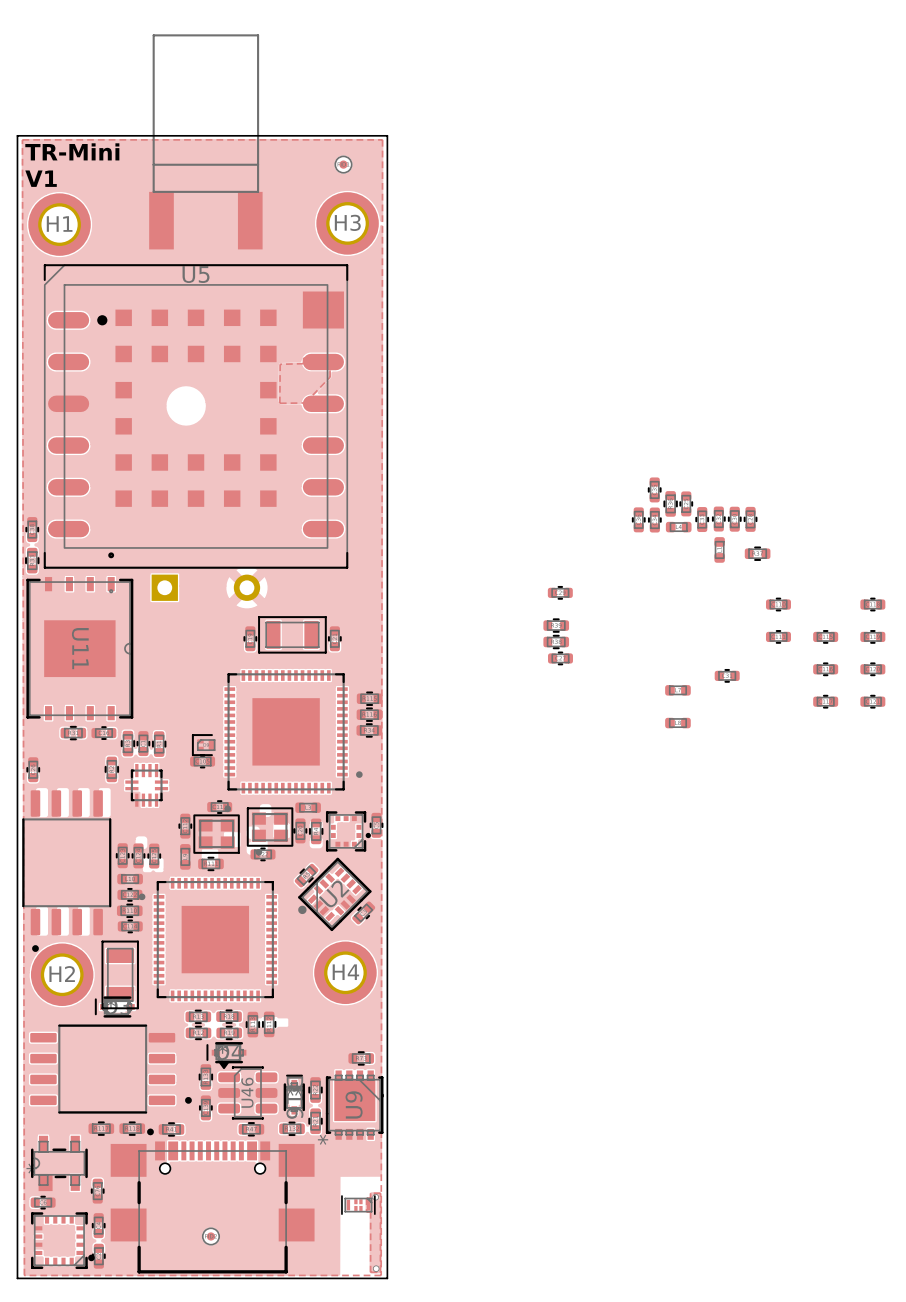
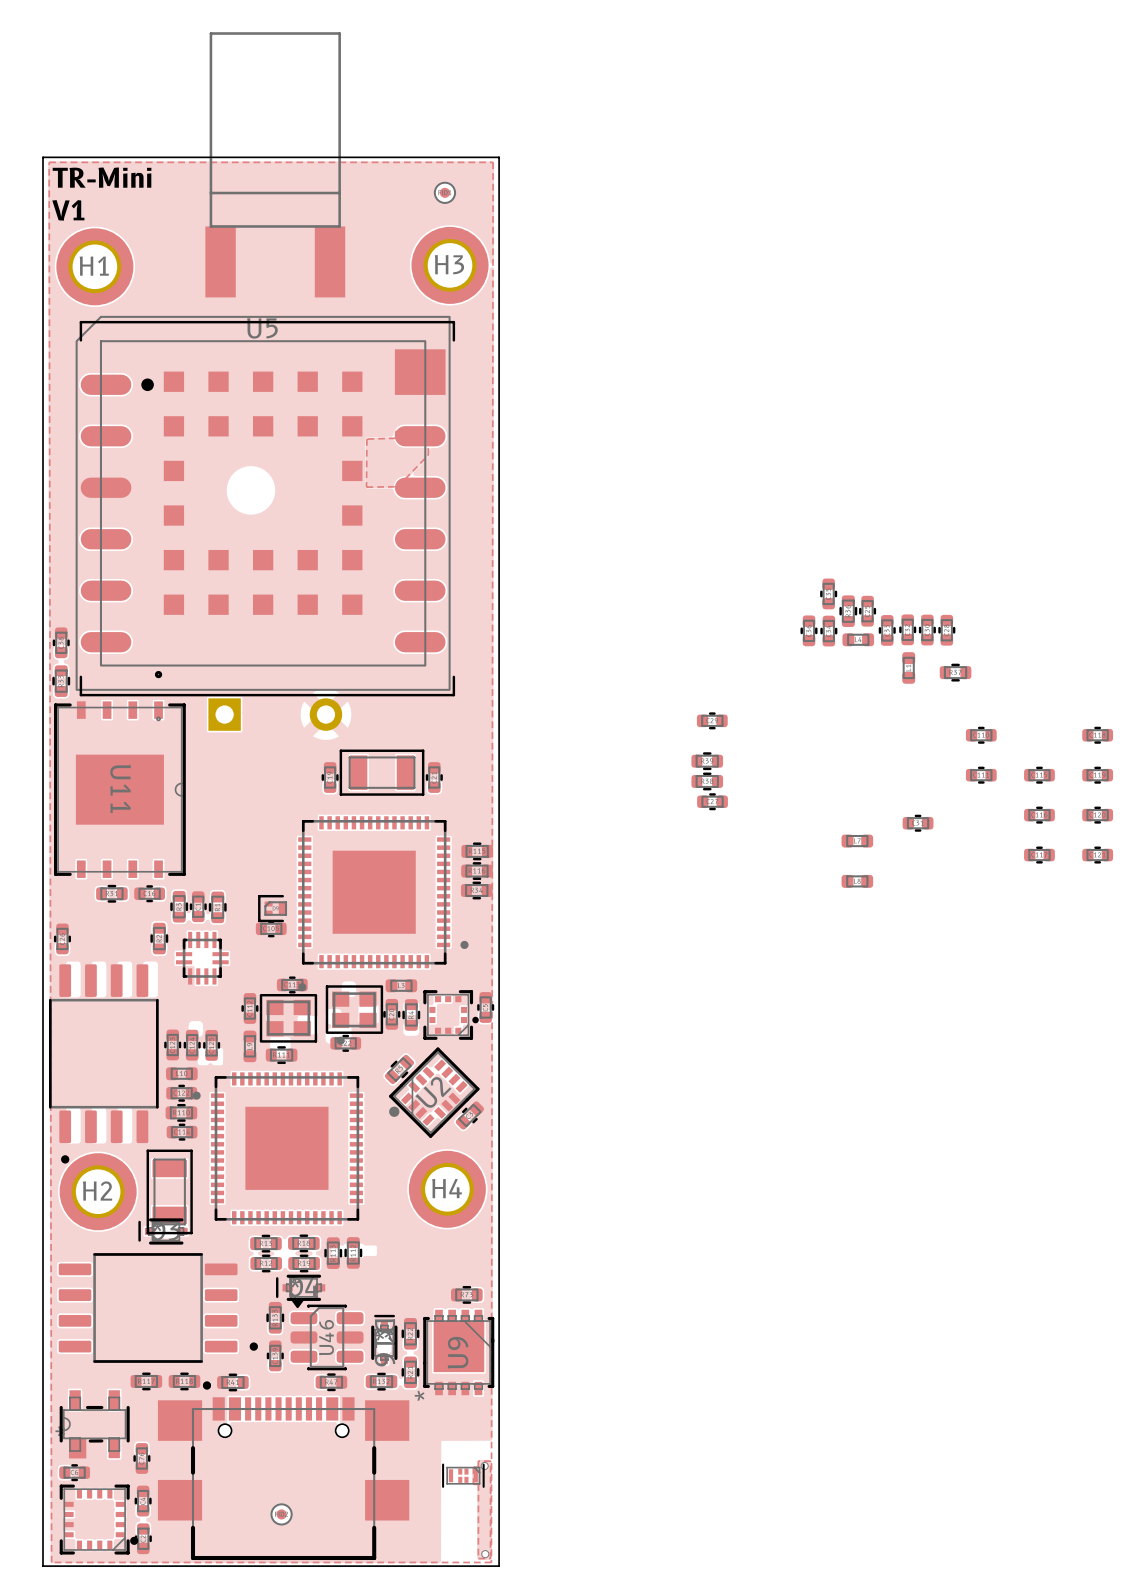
U5 footprint: [43, 264, 349, 569] -> [75, 315, 456, 697]

